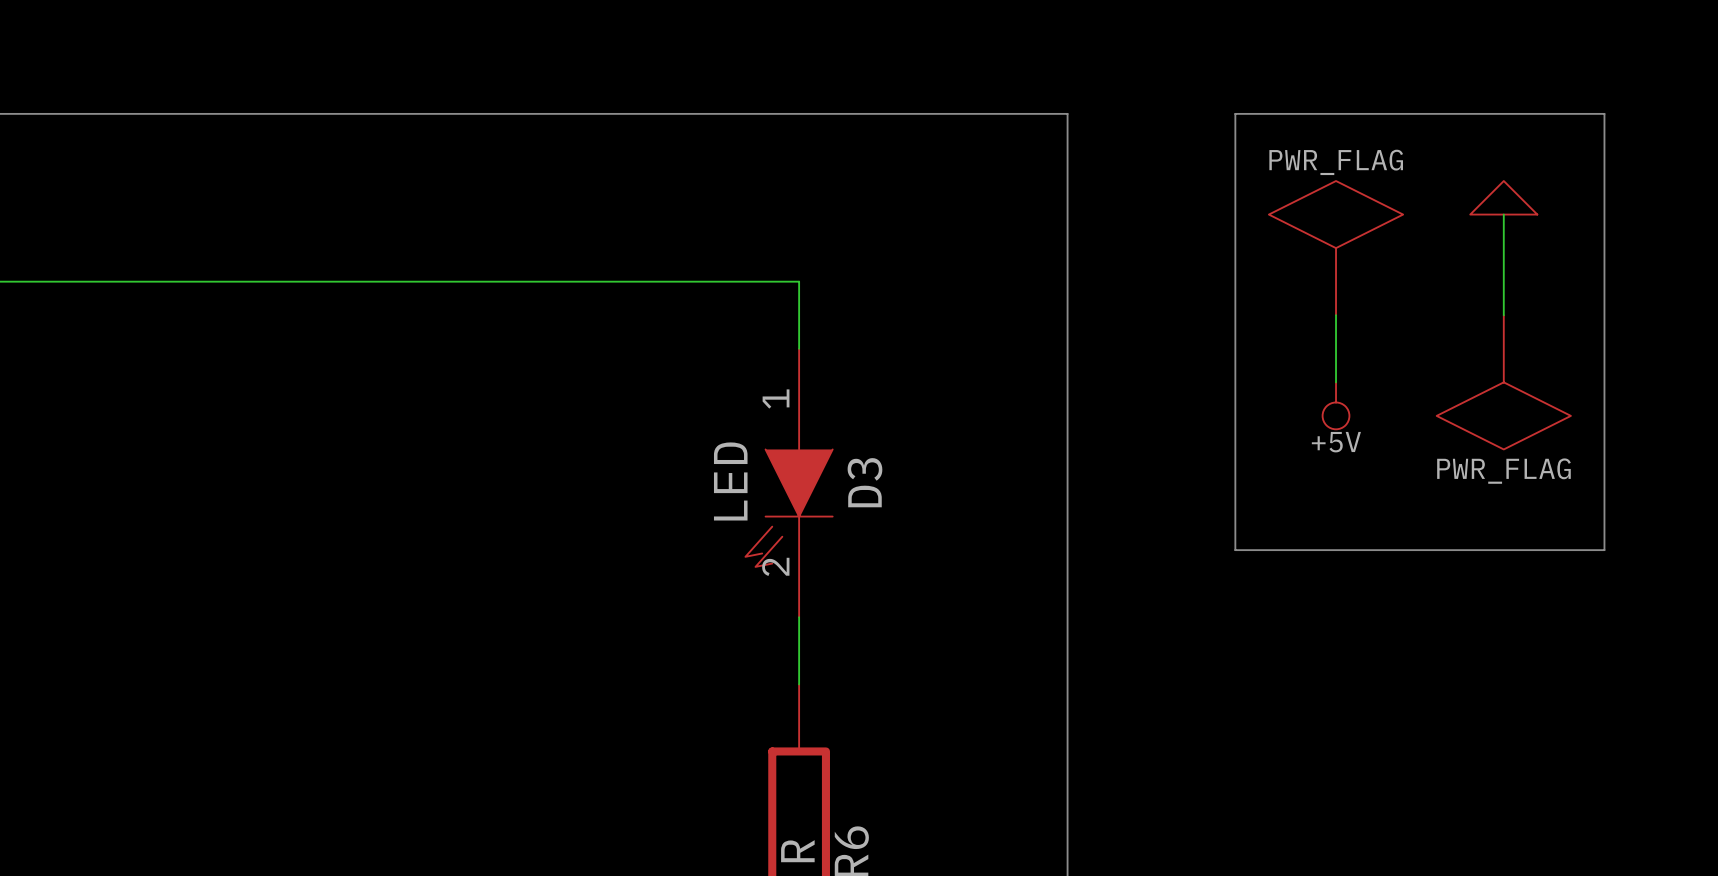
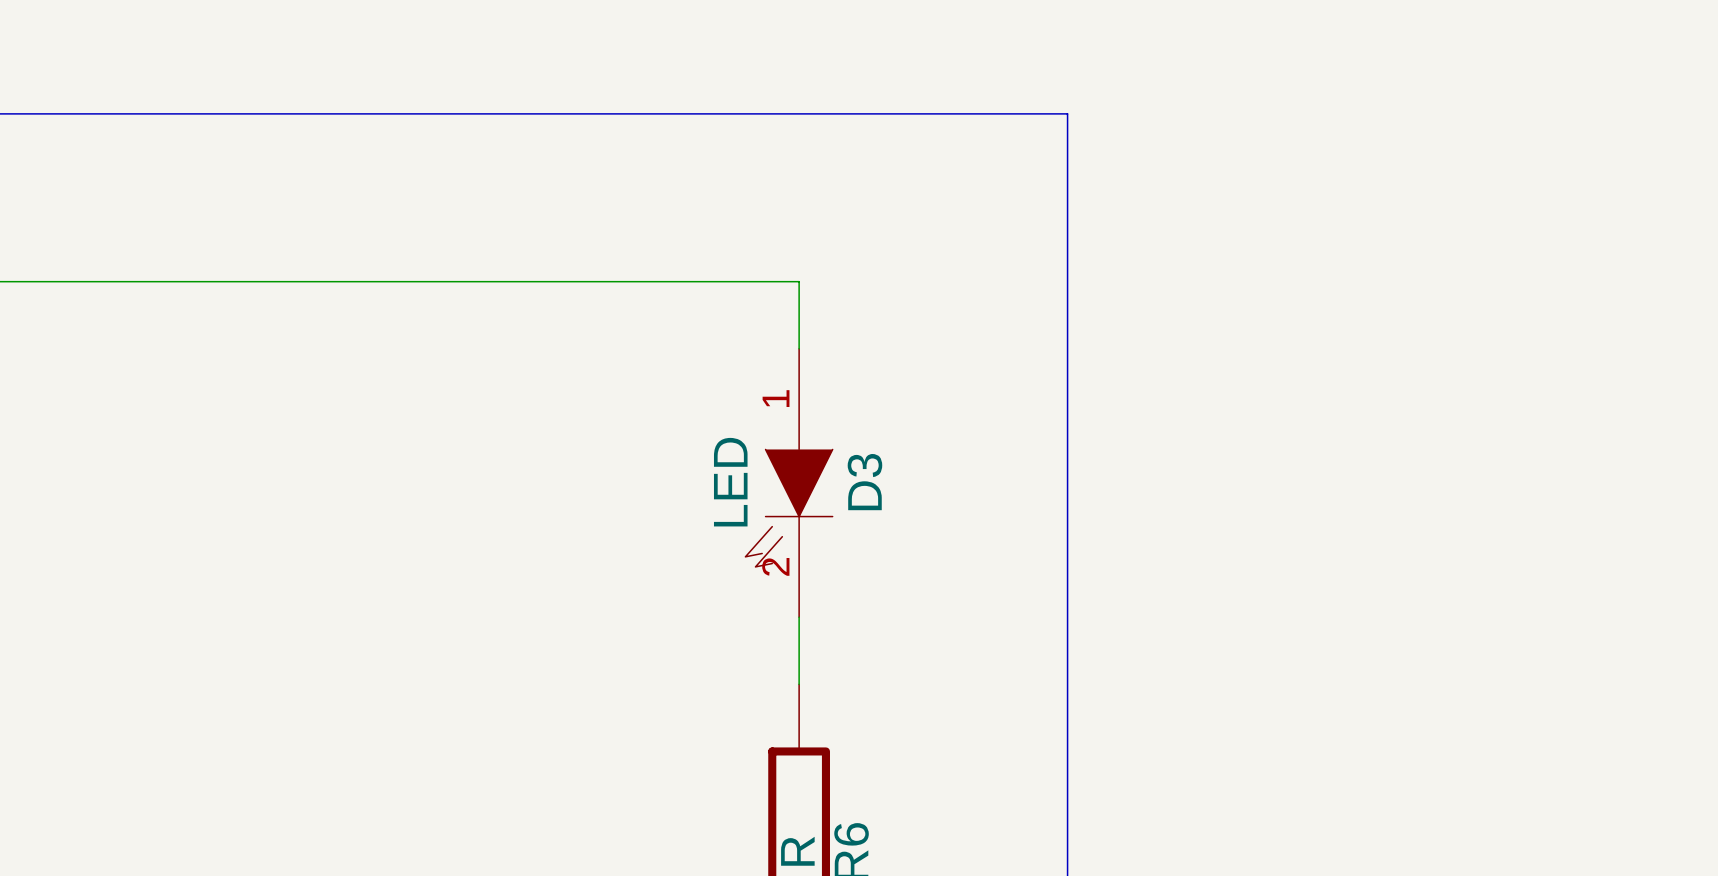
bus: (1235, 113) (1235, 550) (1604, 550) (1604, 113) (1235, 113) -> none
power symbol: (1503, 197) -> none
wire: (1503, 214) (1503, 315) -> none
power symbol: PWR_FLAG (1336, 248) -> none
wire: (1336, 315) (1336, 382) -> none
power symbol: PWR_FLAG (1503, 382) -> none
power symbol: +5V (1336, 405) -> none

